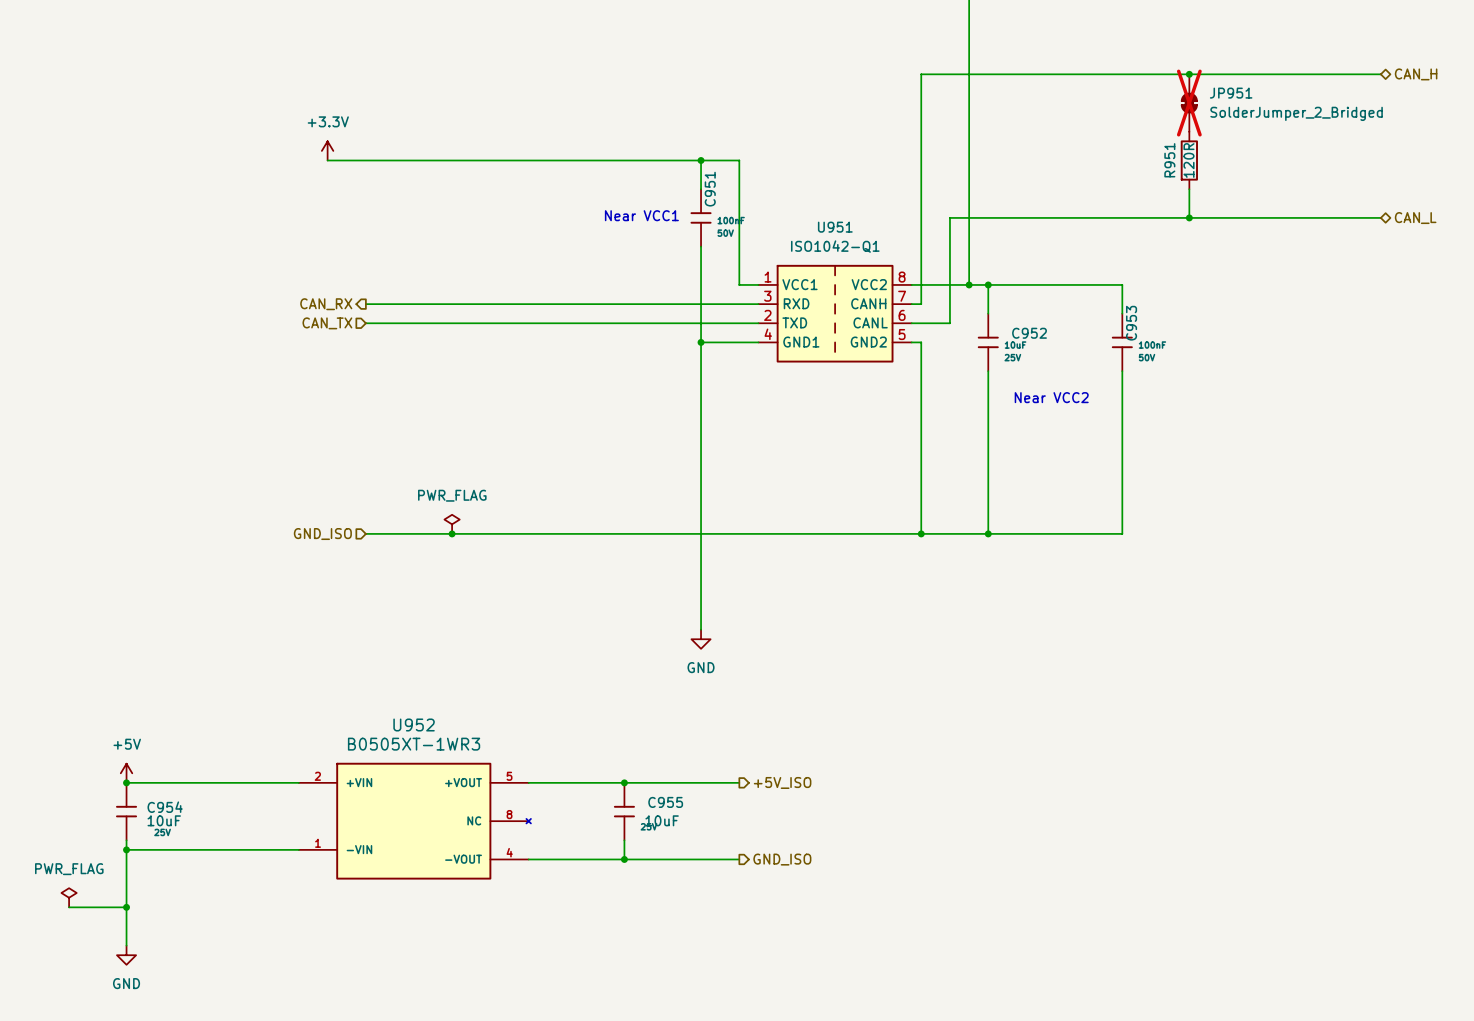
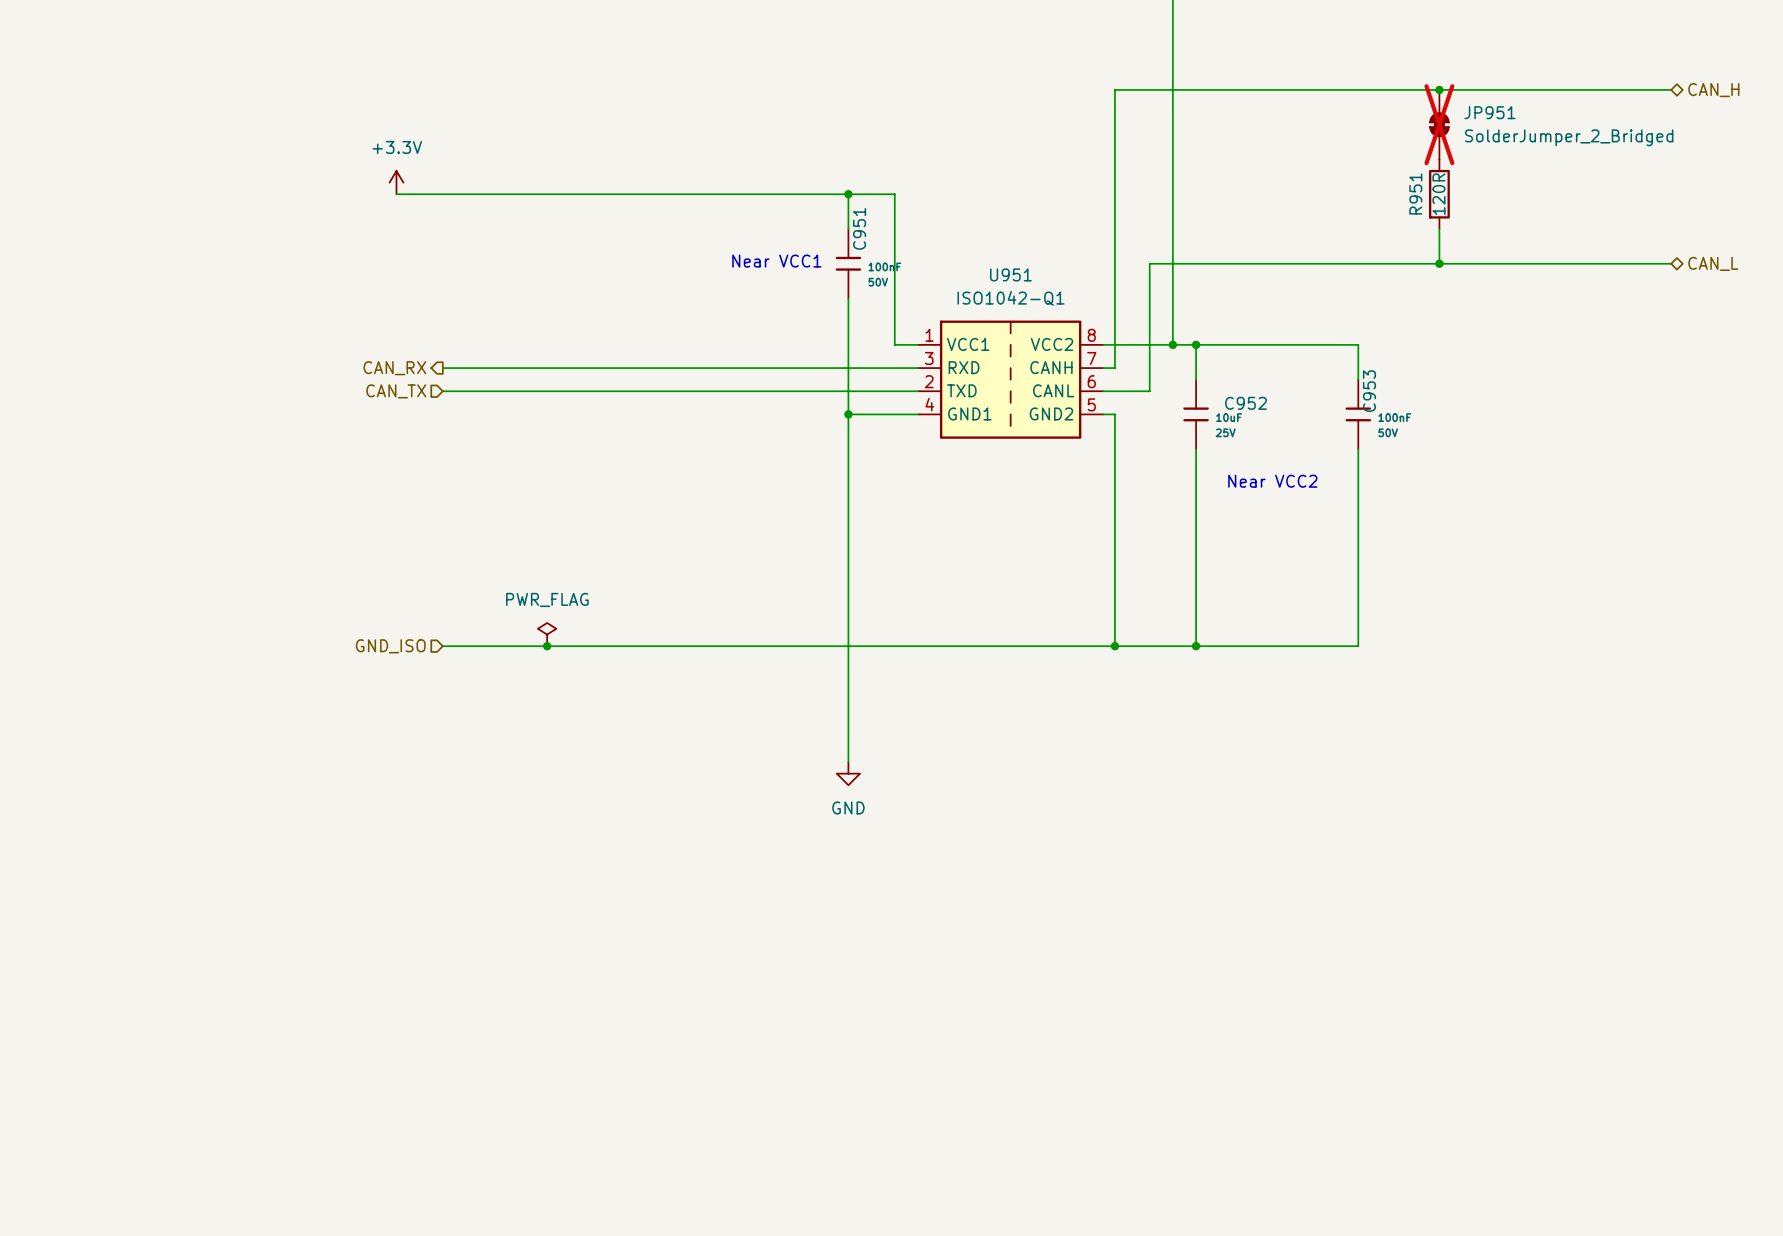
power symbol: +5V (126, 773) -> none
wire: (126, 782) (298, 782) -> none
junction: (126, 782) -> none
wire: (528, 782) (739, 782) -> none
junction: (624, 782) -> none
hierarchical label: +5V_ISO (782, 782) -> none
C954: 10uF (126, 811) -> none
C955: 10uF (624, 811) -> none
U952: B0505XT-1WR3 (414, 821) -> none
wire: (126, 840) (126, 945) -> none
wire: (624, 840) (624, 859) -> none
wire: (126, 849) (298, 849) -> none
junction: (126, 849) -> none
wire: (528, 859) (739, 859) -> none
junction: (624, 859) -> none
hierarchical label: GND_ISO (782, 859) -> none
power symbol: PWR_FLAG (69, 897) -> none
wire: (69, 907) (126, 907) -> none
junction: (126, 907) -> none
power symbol: GND (126, 955) -> none

